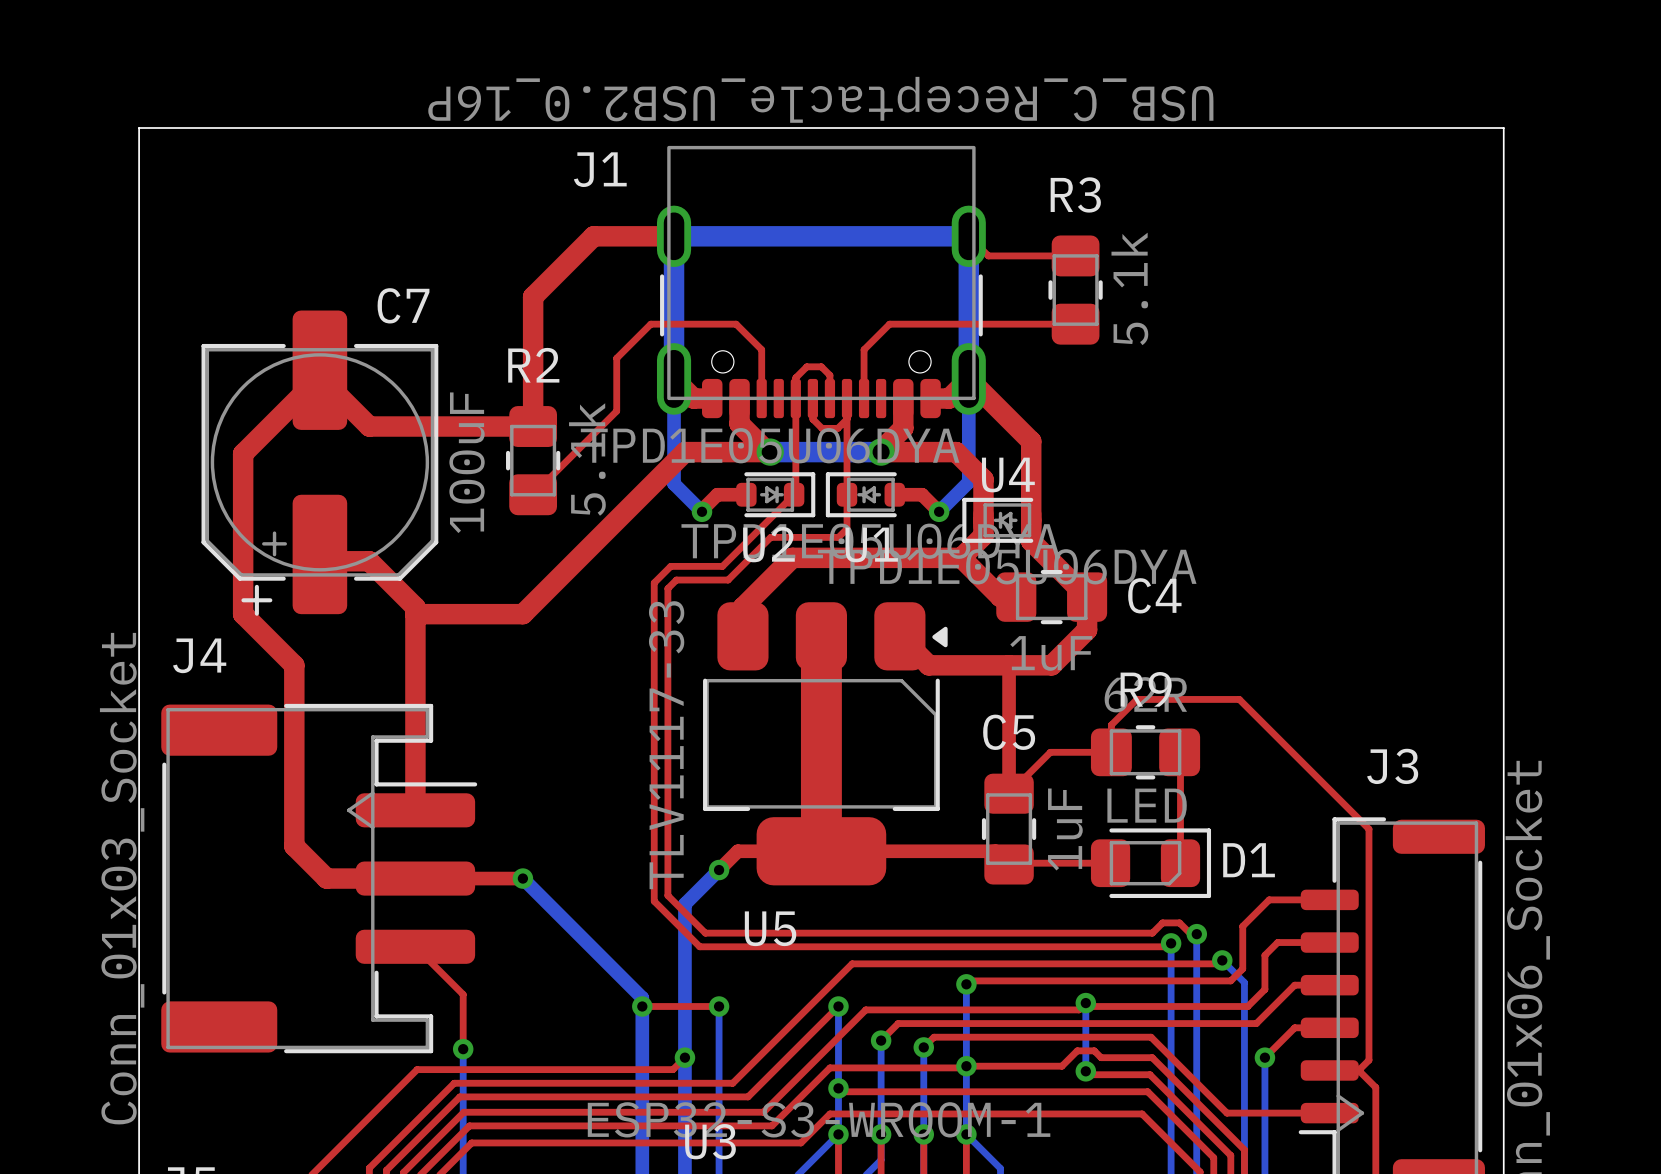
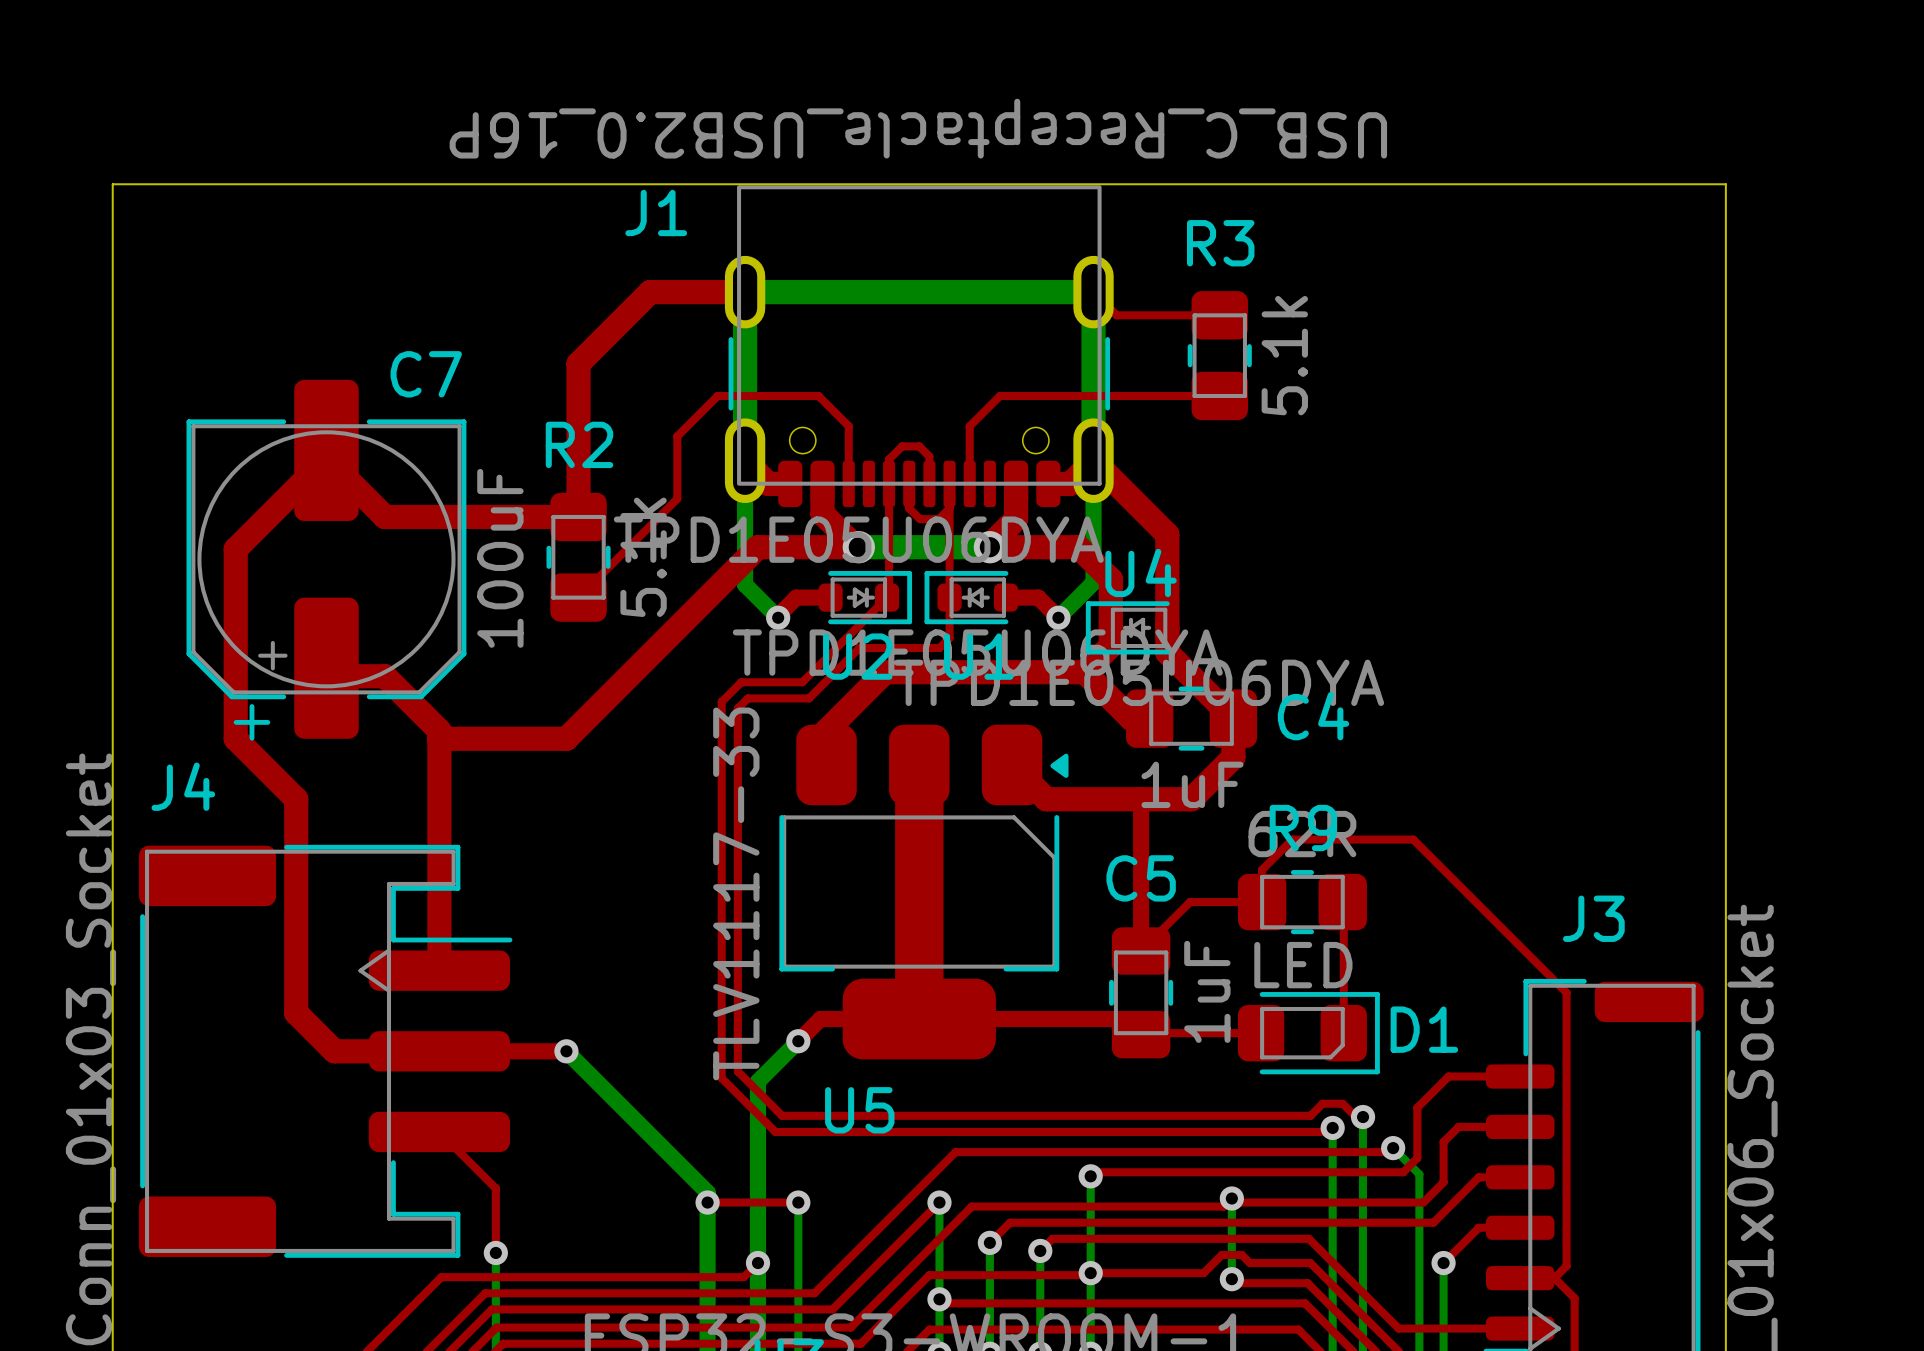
board edge: (139, 145) (139, 128) (1503, 128) (1503, 145) -> (112, 184) (1725, 184)

